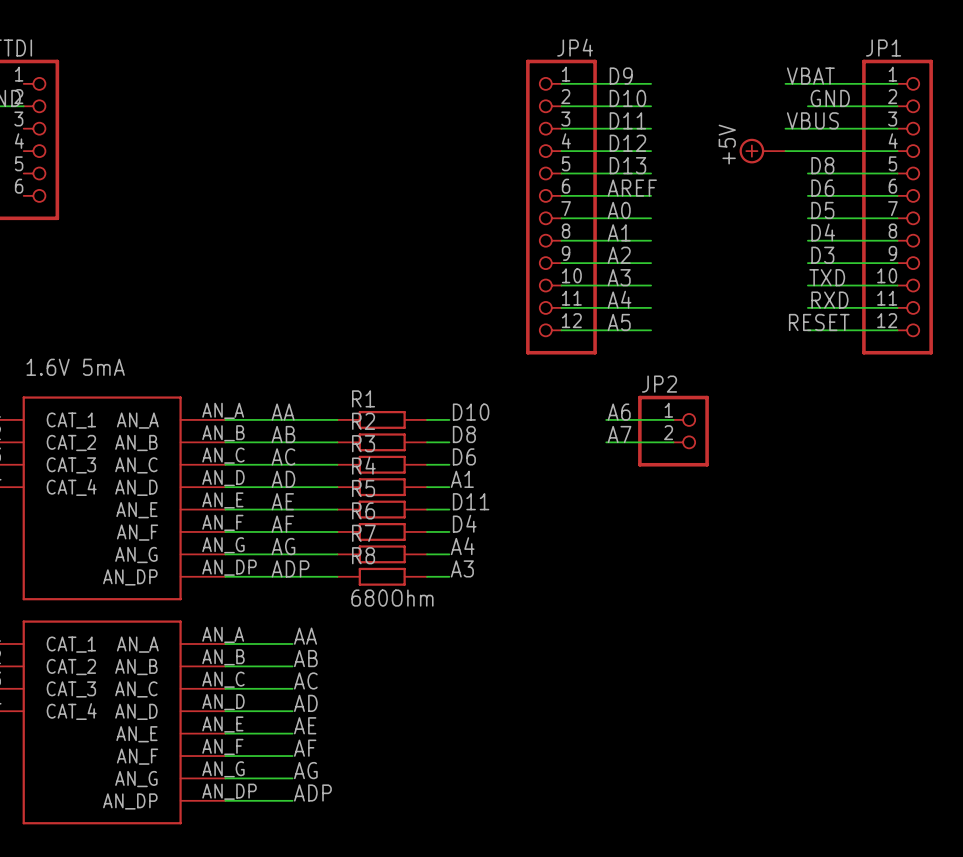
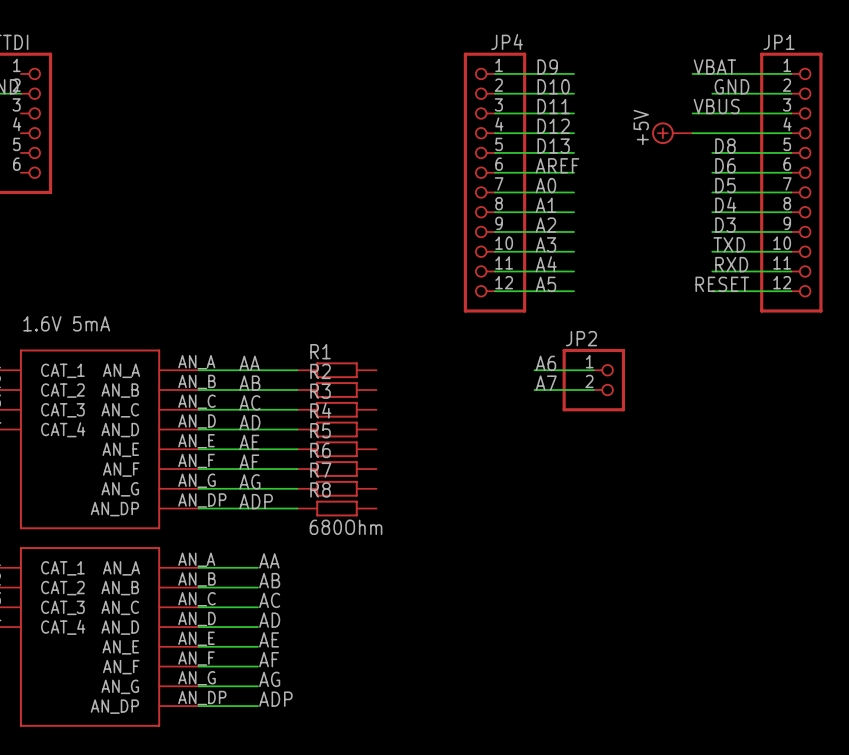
label: D10 (471, 412) -> none
wire: (427, 419) (449, 419) -> none
label: D8 (464, 434) -> none
wire: (427, 442) (449, 442) -> none
label: D6 (464, 456) -> none
wire: (427, 464) (449, 464) -> none
label: A1 (462, 479) -> none
wire: (427, 487) (449, 487) -> none
label: D11 (471, 501) -> none
wire: (427, 509) (449, 509) -> none
label: D4 (464, 523) -> none
wire: (427, 531) (449, 531) -> none
label: A4 (462, 546) -> none
wire: (427, 554) (449, 554) -> none
label: A3 (462, 568) -> none
wire: (427, 576) (449, 576) -> none

